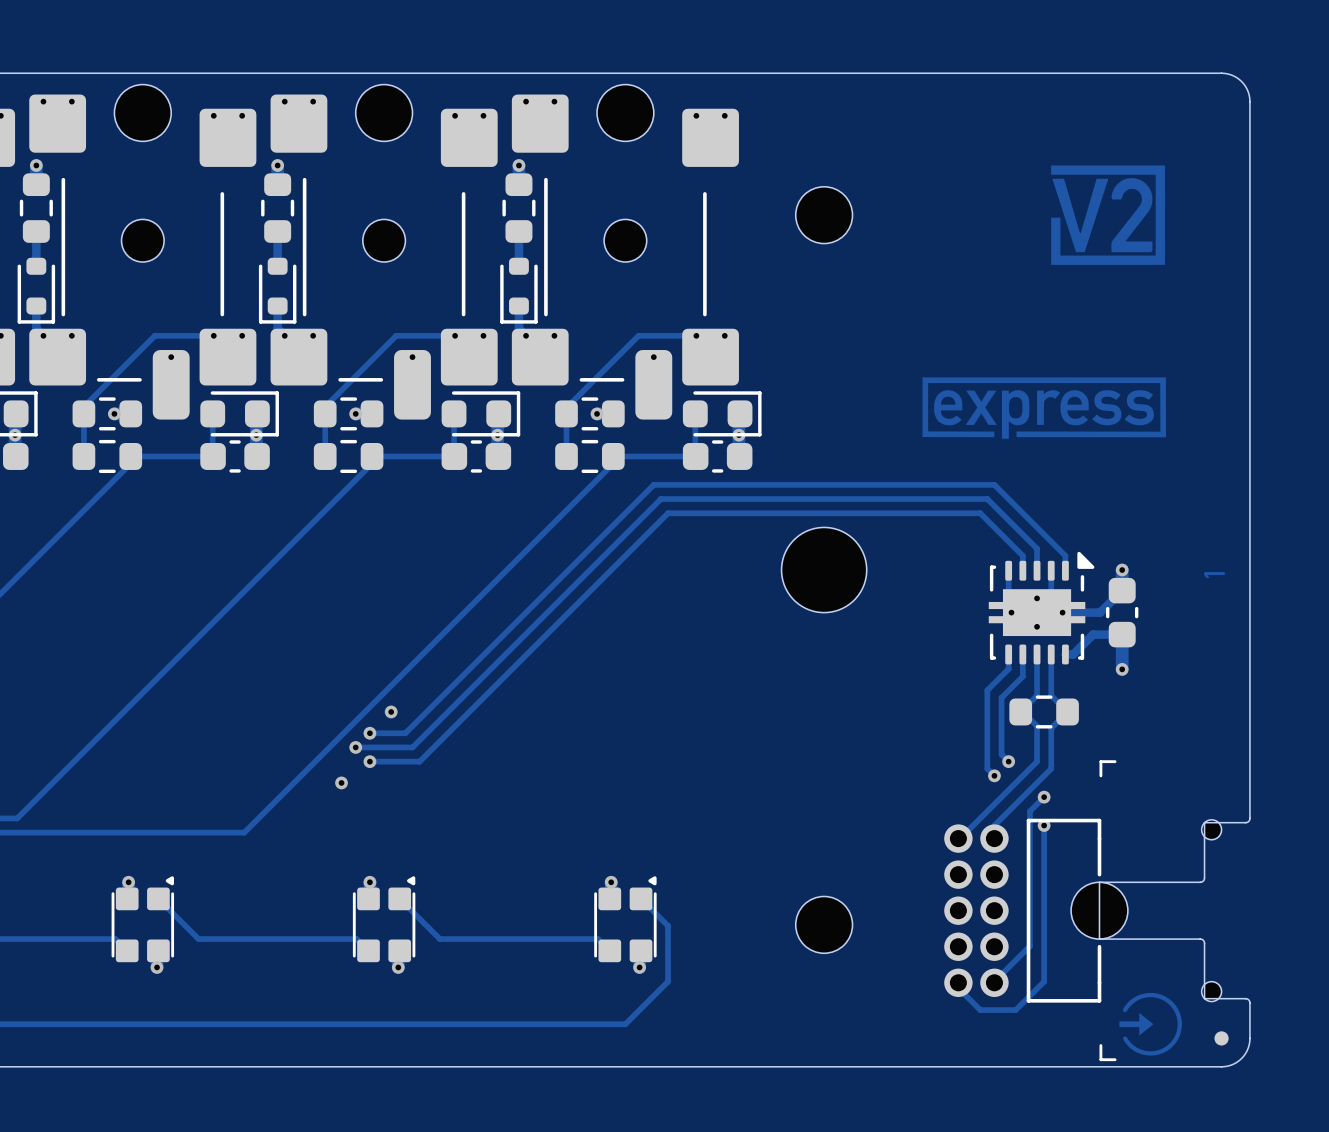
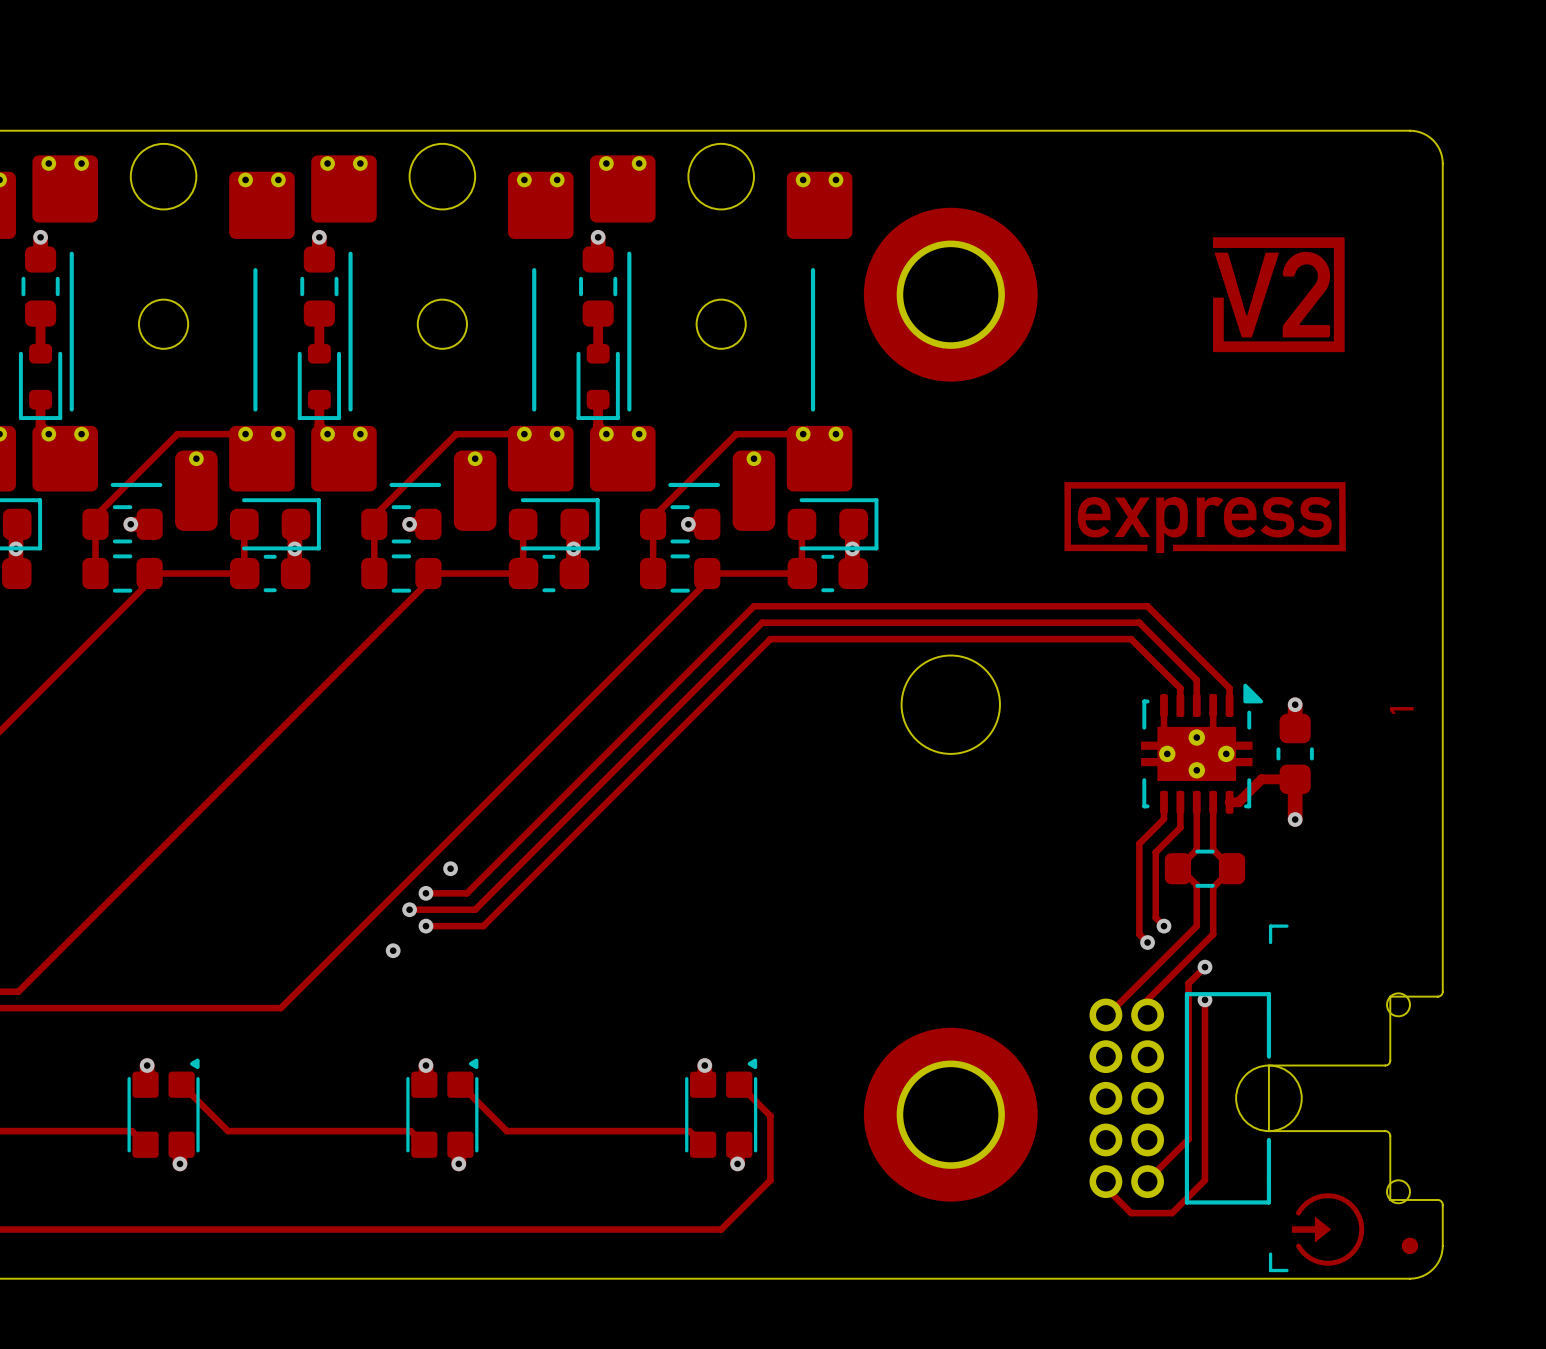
part footprint: [795, 186, 853, 244] -> [863, 207, 1038, 382]
track: (1122, 590) (1100, 612) (1062, 612) -> none
part footprint: [795, 896, 853, 954] -> [863, 1027, 1038, 1202]

